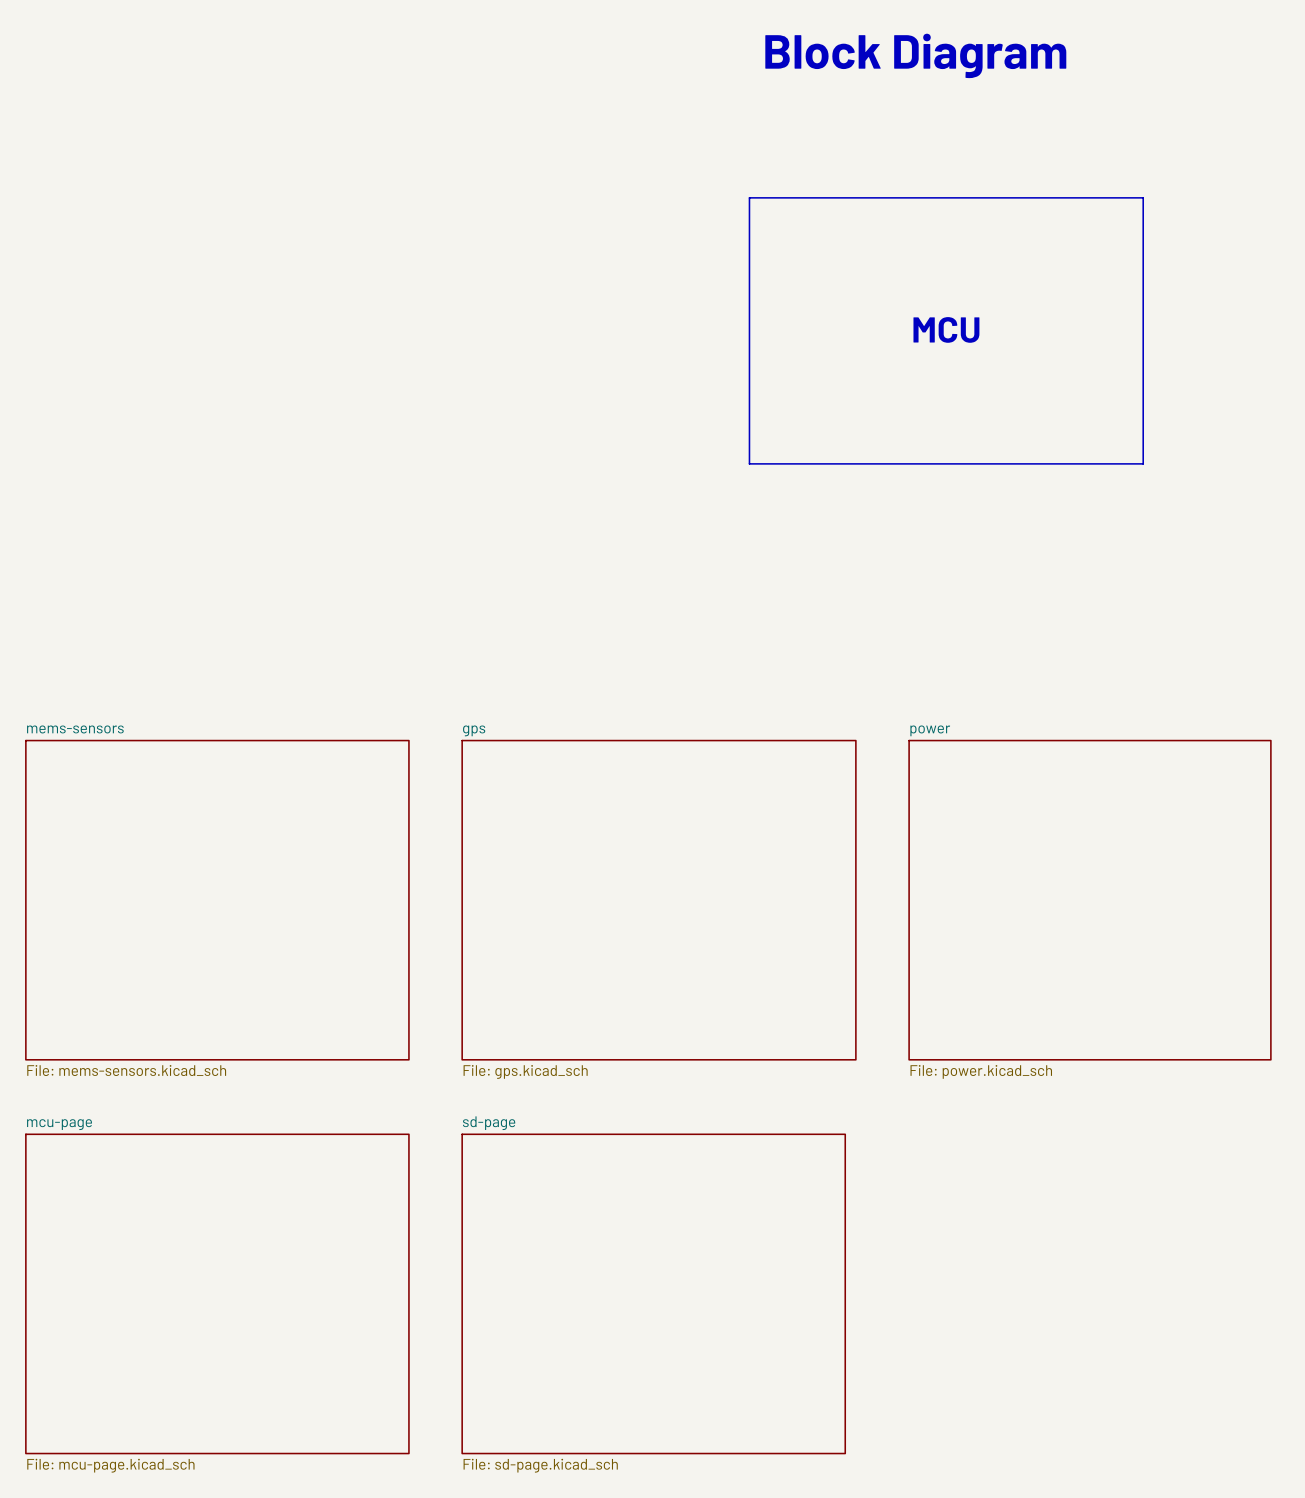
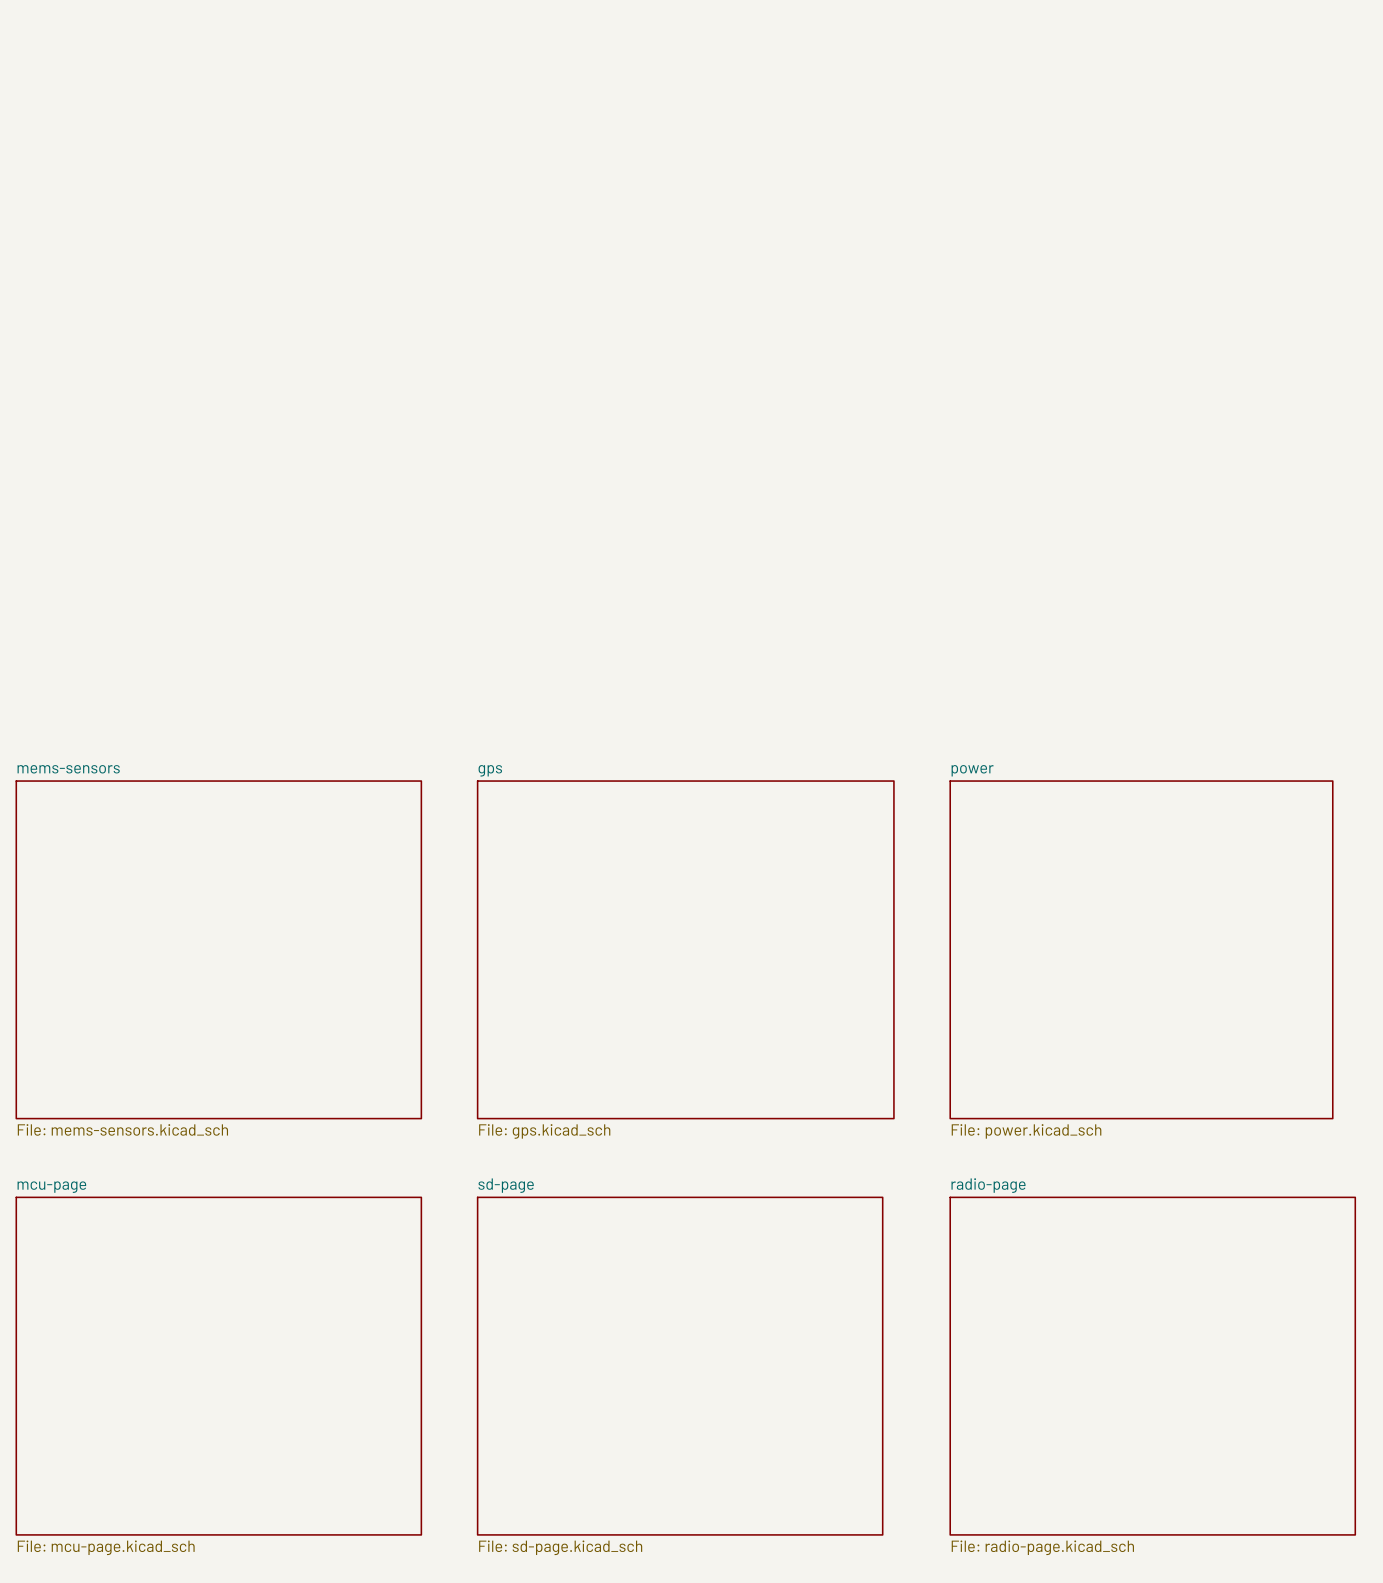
text: Block Diagram (915, 55) -> none
line: (749, 197) (1143, 197) (1143, 463) (749, 463) (749, 197) -> none
text: MCU (946, 329) -> none
sheet radio-page: none -> File: radio-page.kicad_sch (1152, 1366)

